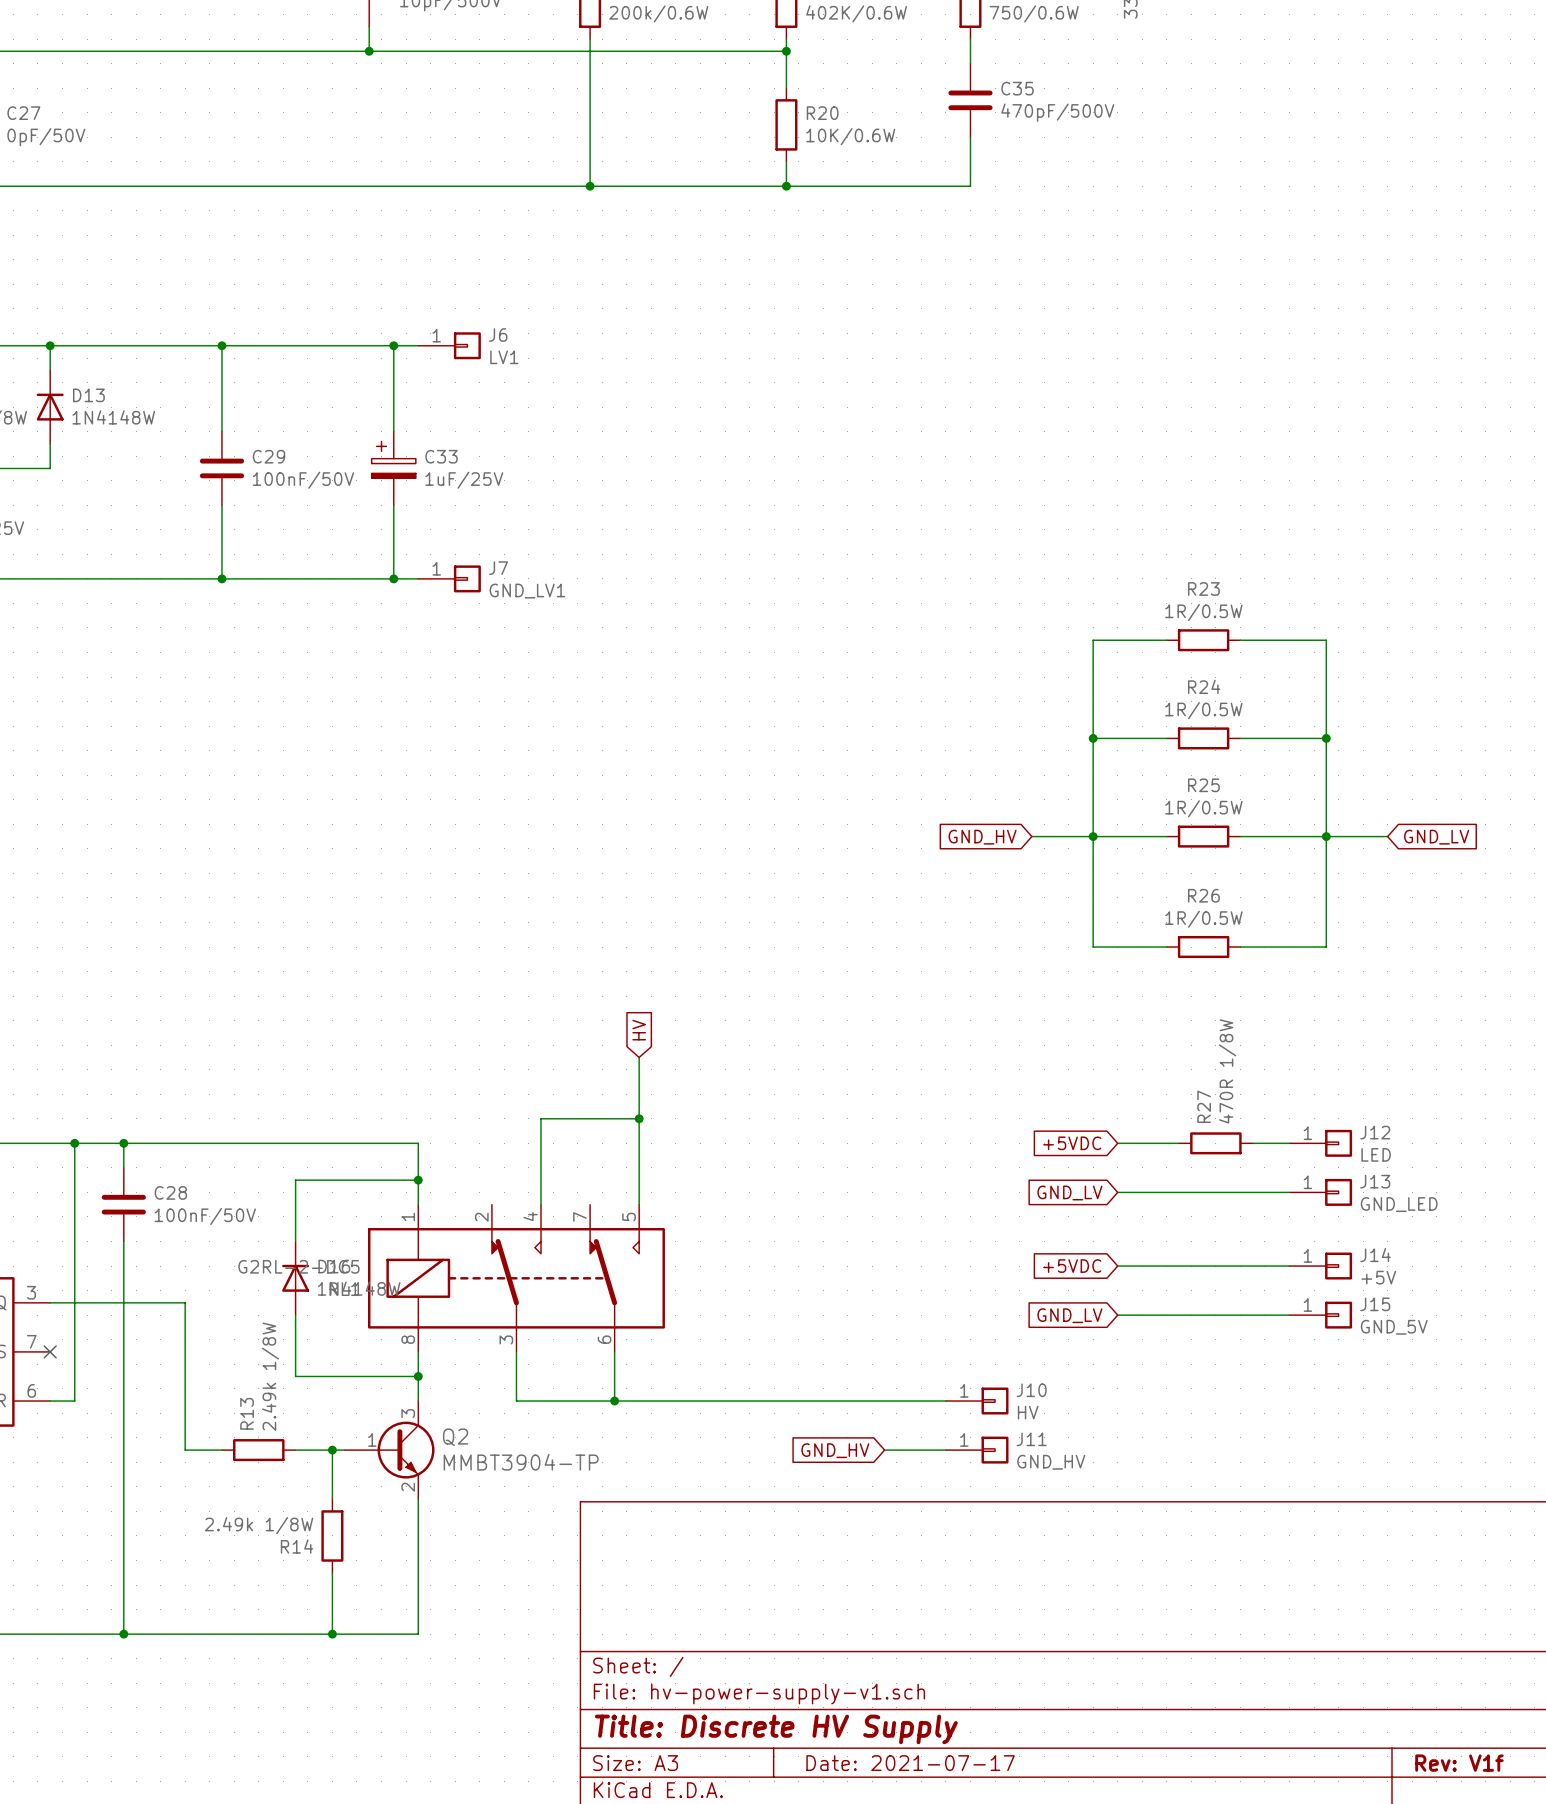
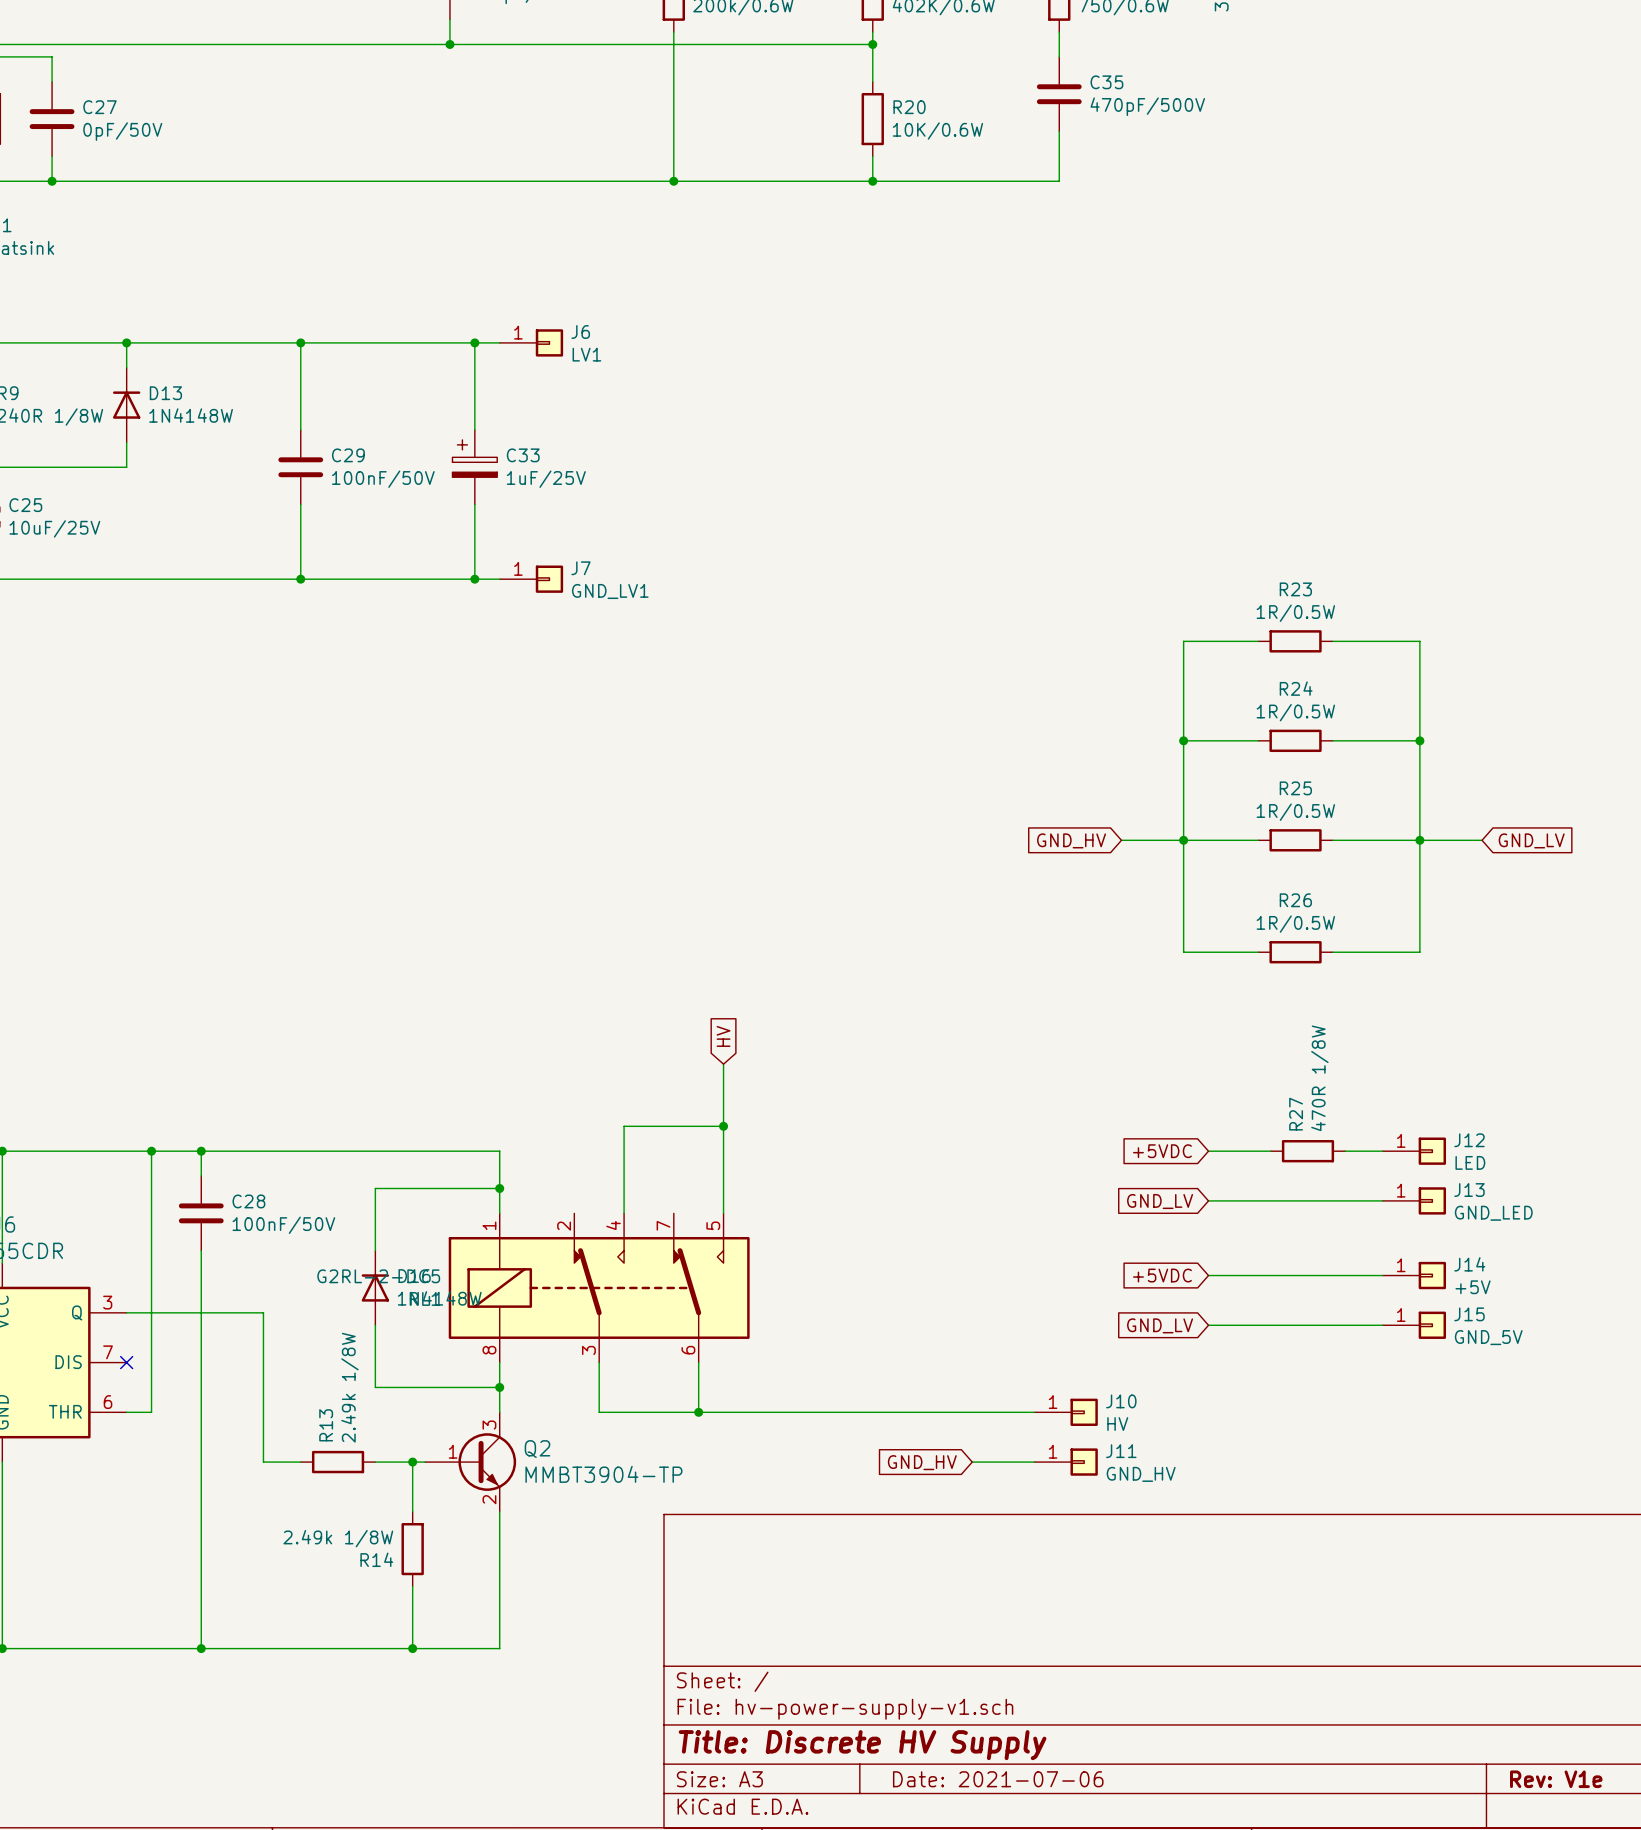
title block: Date: 2021-07-17 (910, 1763) -> Date: 2021-07-06 (998, 1779)
title block: Rev: V1f (1459, 1763) -> Rev: V1e (1556, 1779)

